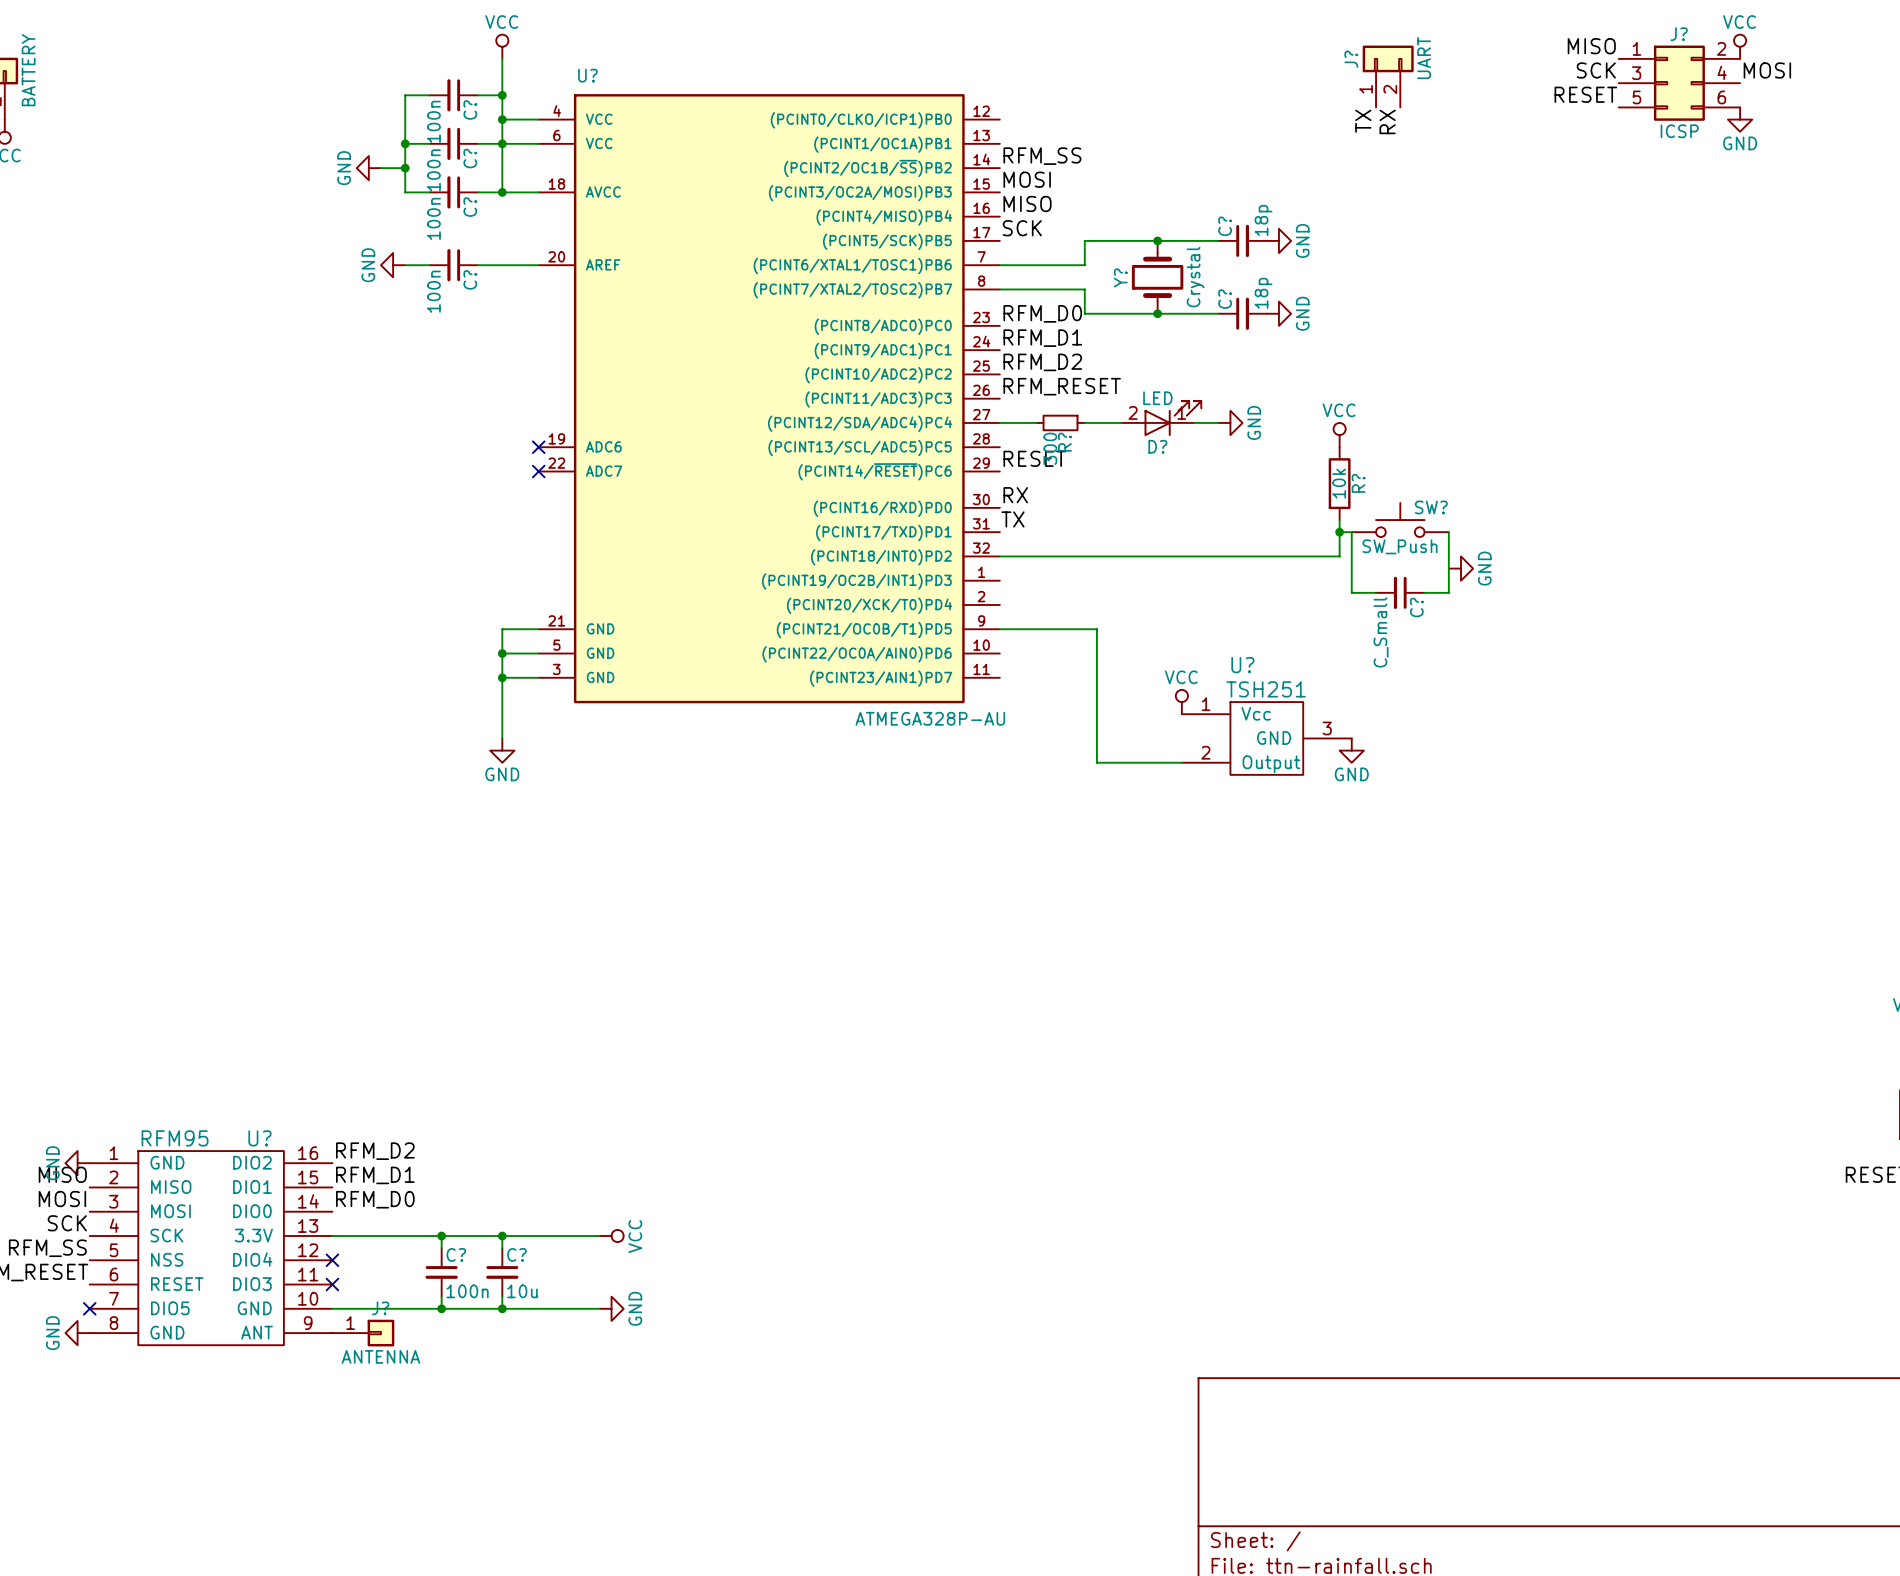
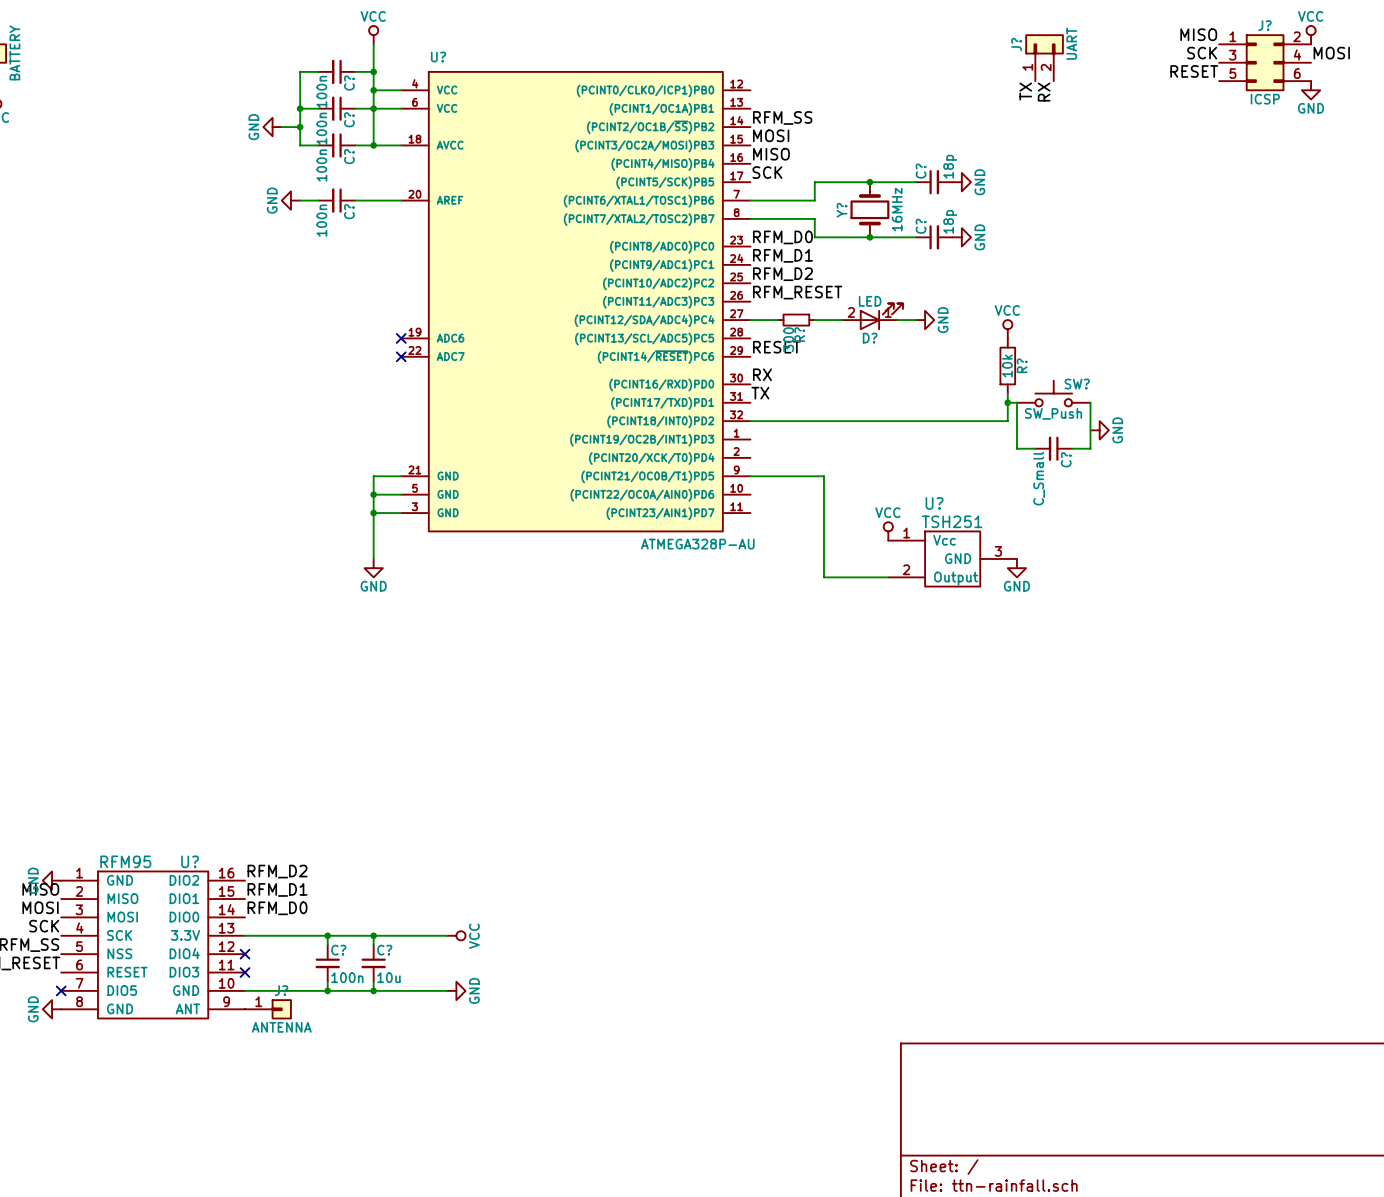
Y? value: Crystal (1195, 277) -> 16MHz (897, 209)

